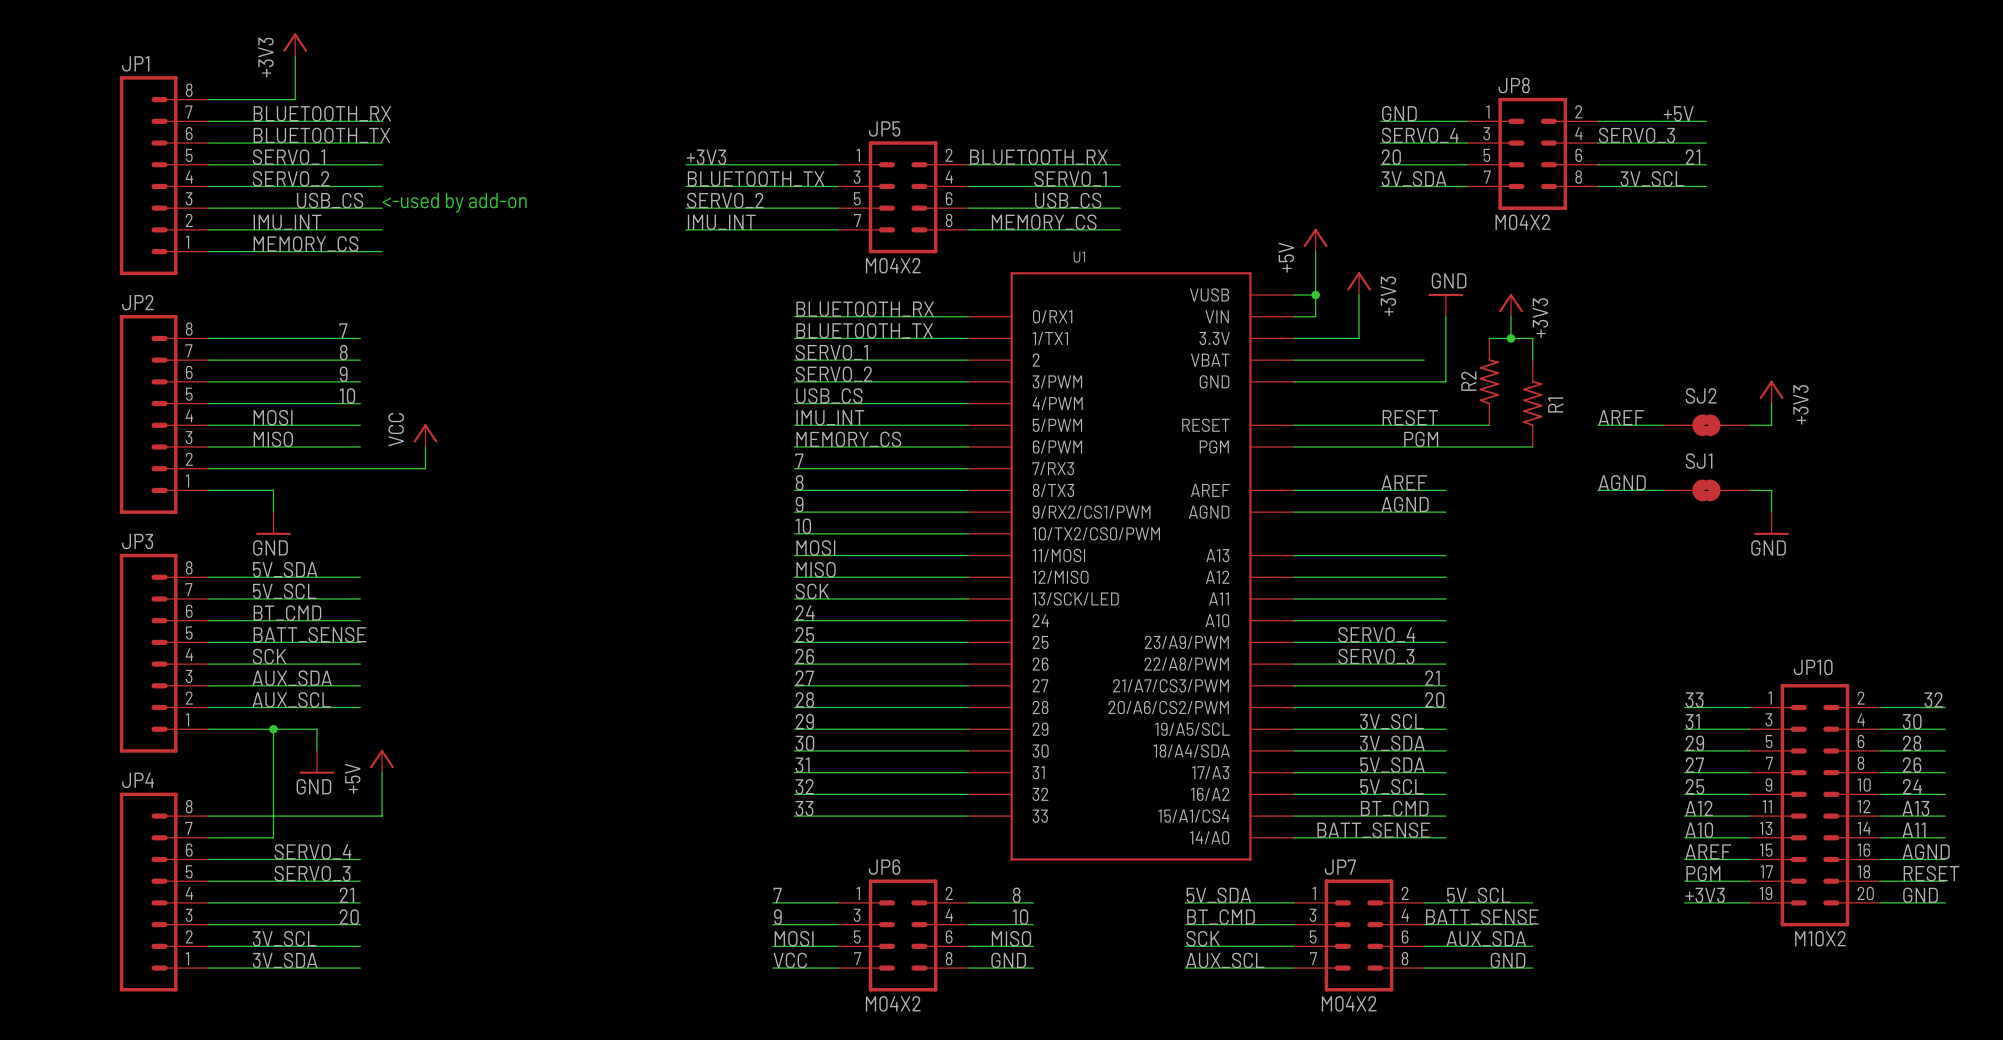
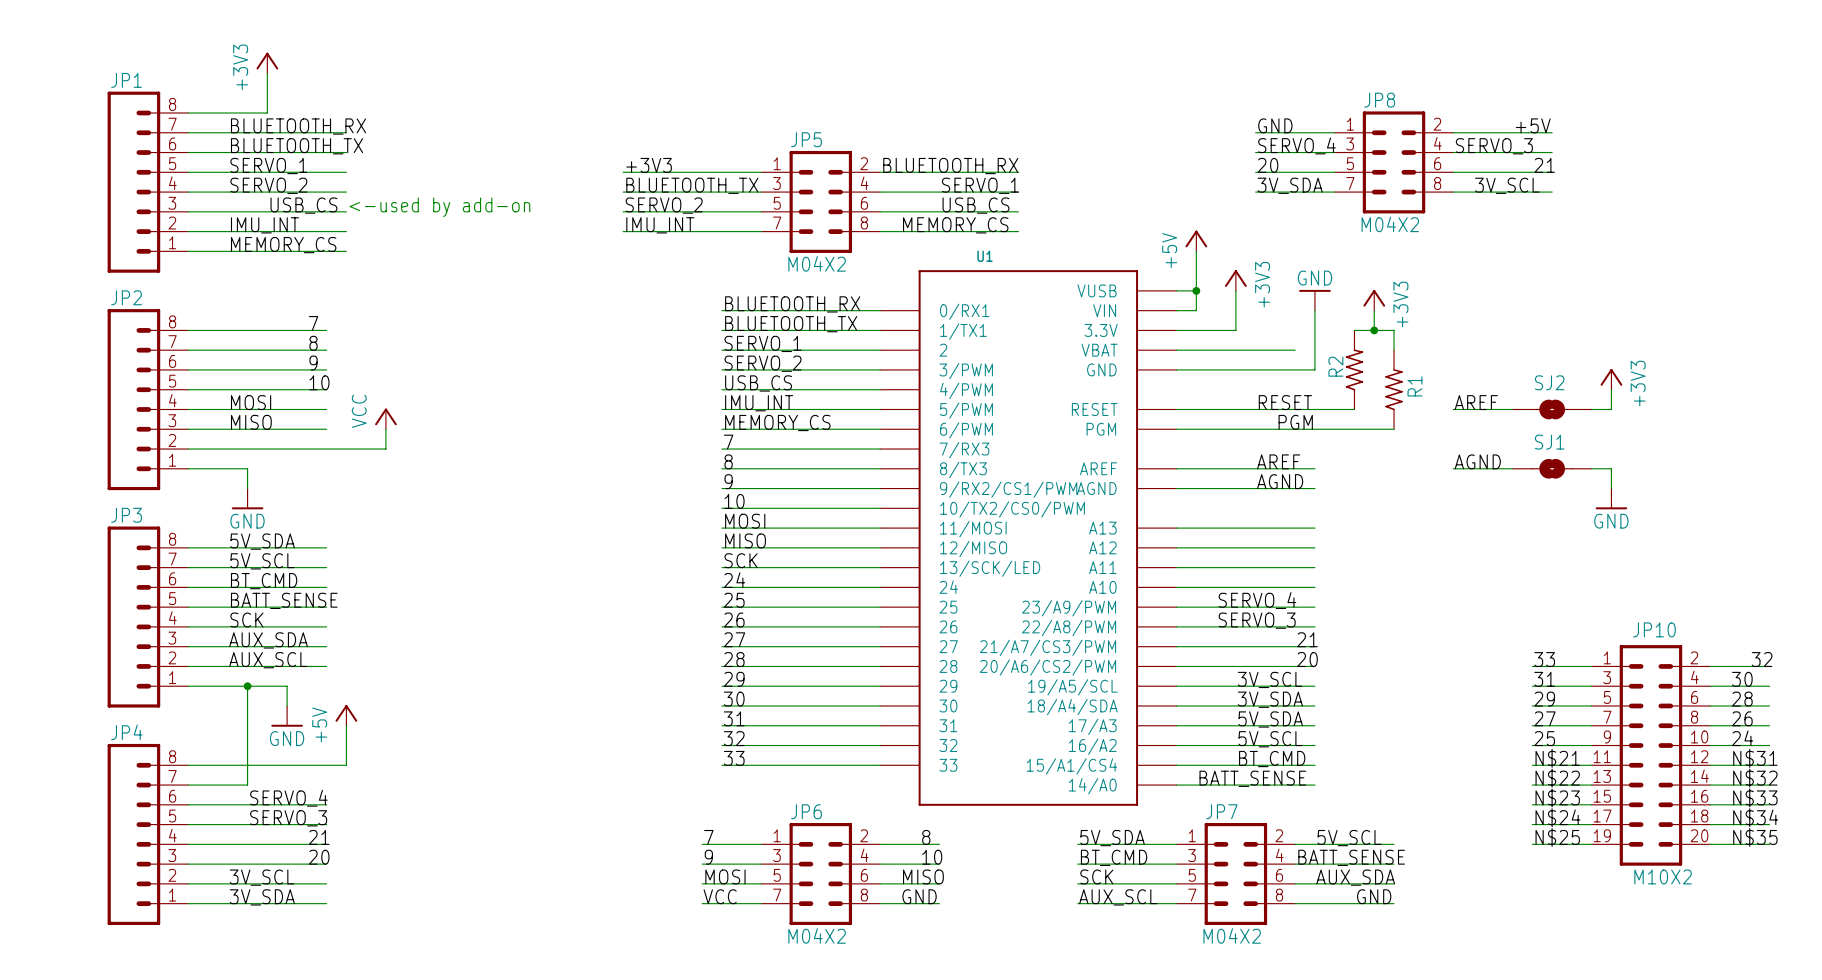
label: A12 (1699, 808) -> N$21 (1557, 758)
label: A13 (1915, 808) -> N$31 (1755, 758)
label: A10 (1699, 830) -> N$22 (1557, 778)
label: A11 (1913, 830) -> N$32 (1755, 778)
label: AREF (1708, 851) -> N$23 (1557, 797)
label: AGND (1926, 851) -> N$33 (1755, 797)
label: PGM (1703, 873) -> N$24 (1558, 817)
label: RESET (1931, 873) -> N$34 (1755, 817)
label: +3V3 (1705, 895) -> N$25 (1557, 837)
label: GND (1920, 895) -> N$35 (1755, 837)

